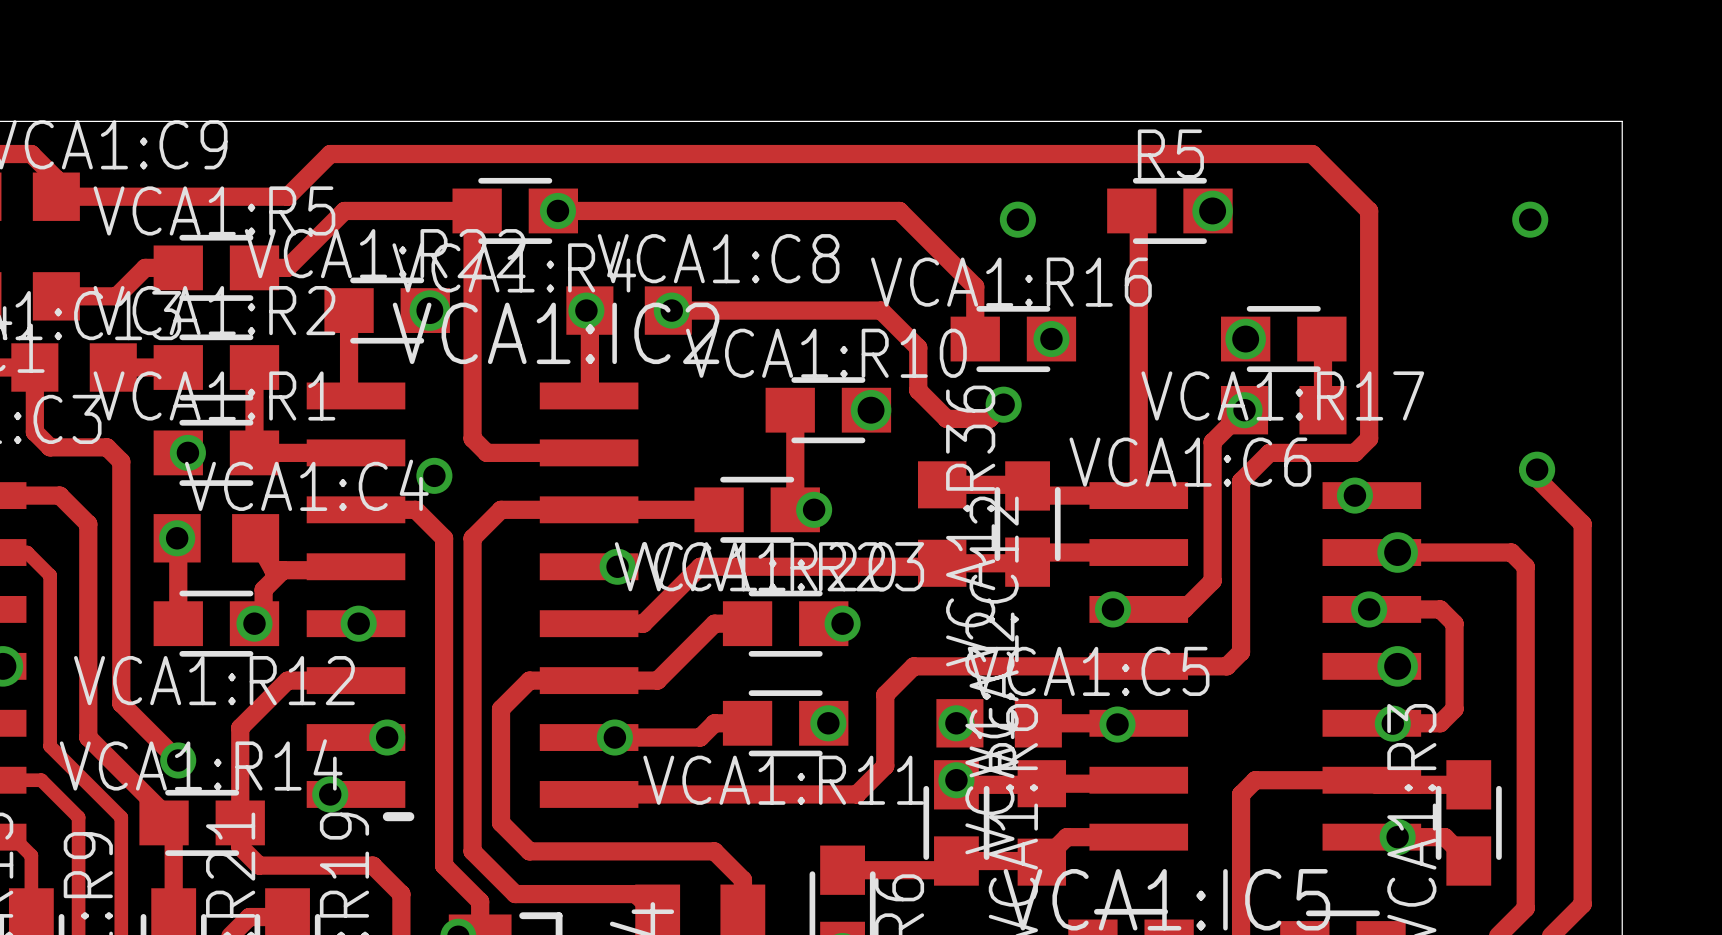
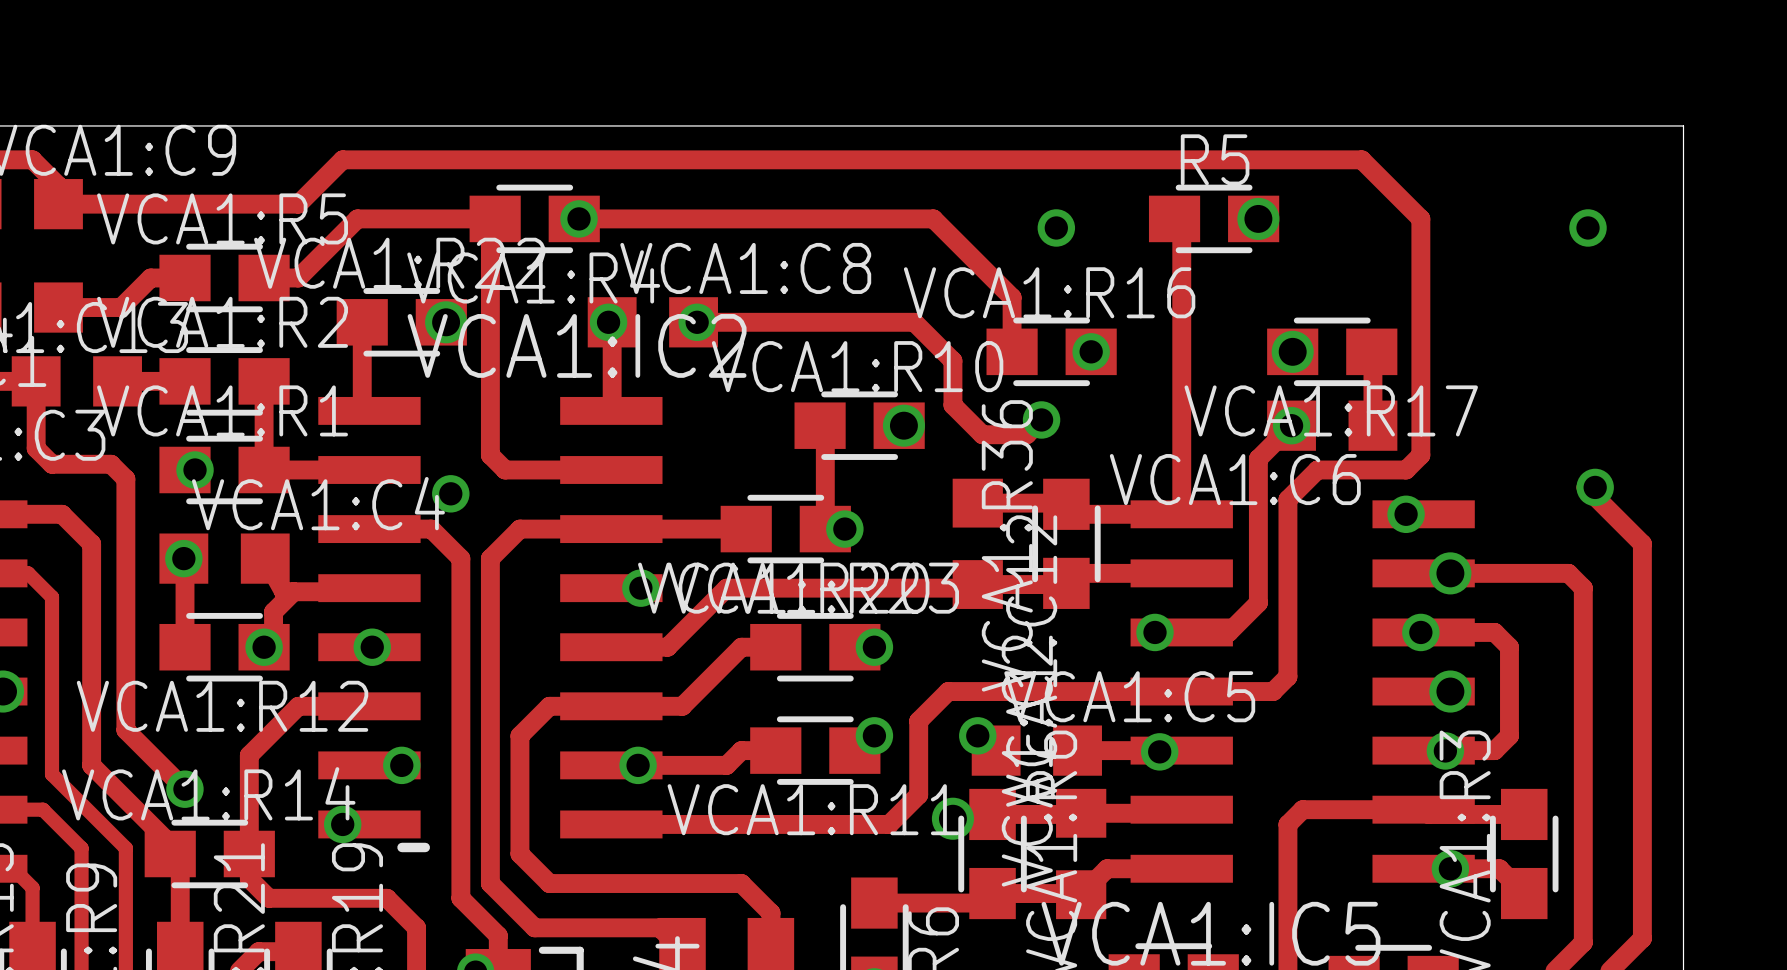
via position: (828, 723) -> (874, 735)
via position: (956, 723) -> (977, 735)
via position: (956, 780) -> (952, 818)

